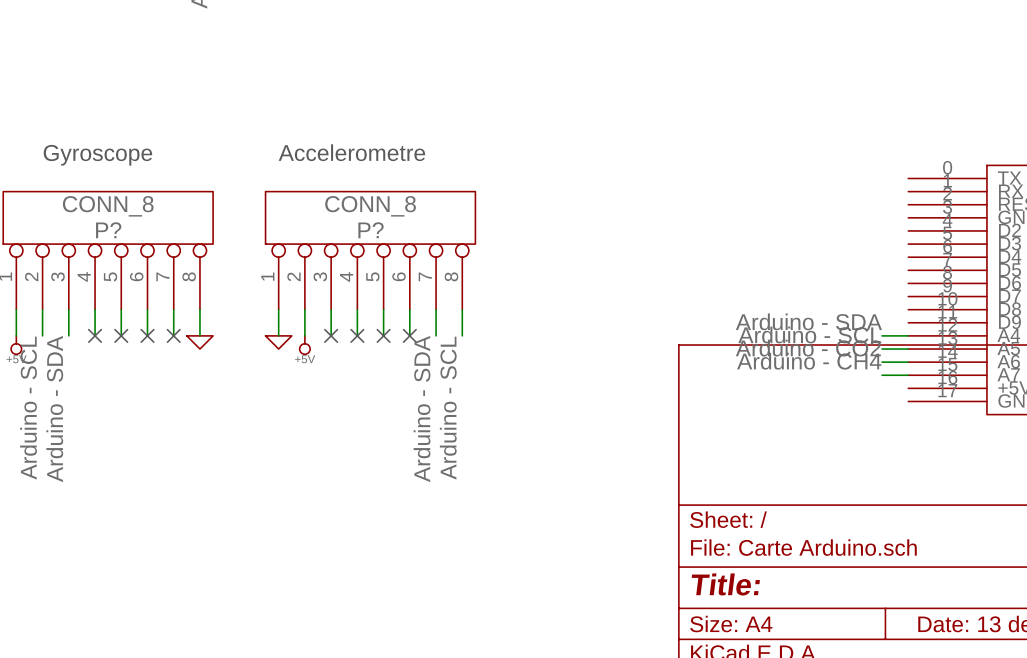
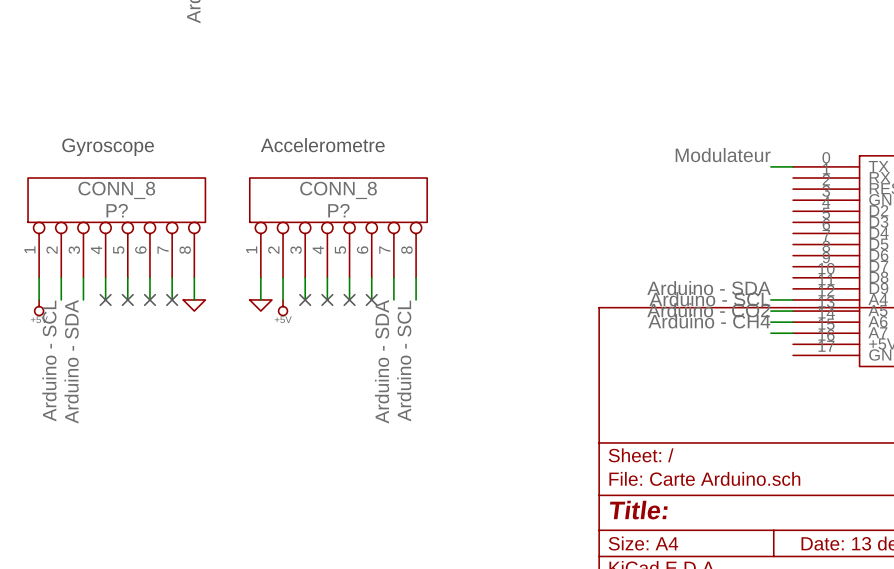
label: none -> Modulateur (723, 155)
wire: none -> (770, 166) (793, 166)

